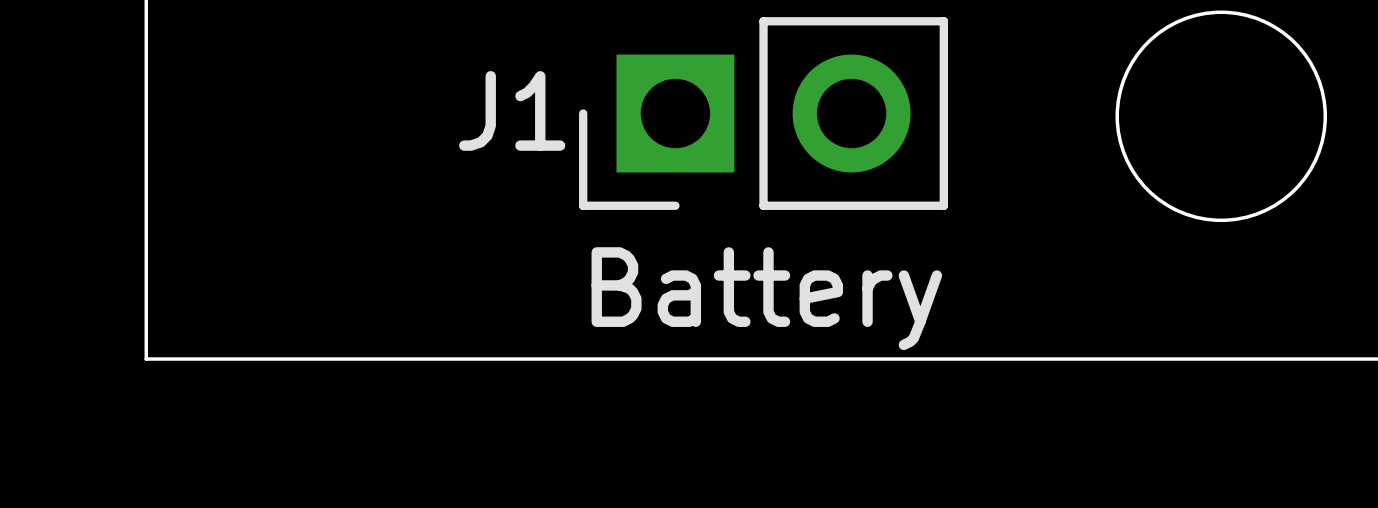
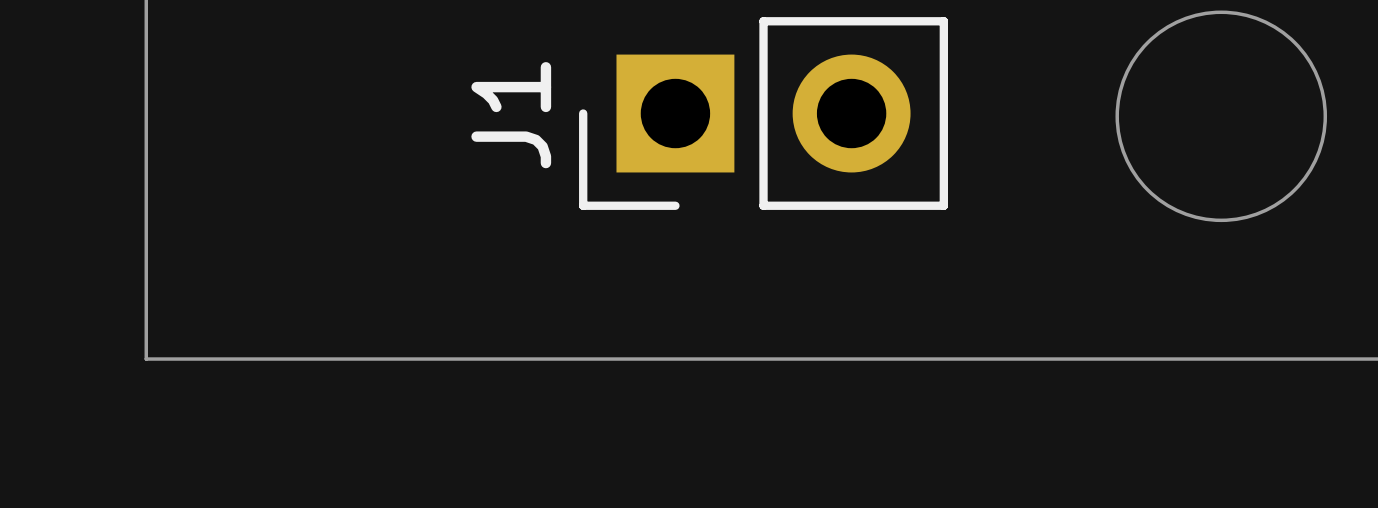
J1 name rotation: 0° (512, 110) -> 90° counterclockwise (511, 115)
J1 value: Battery (766, 298) -> none

